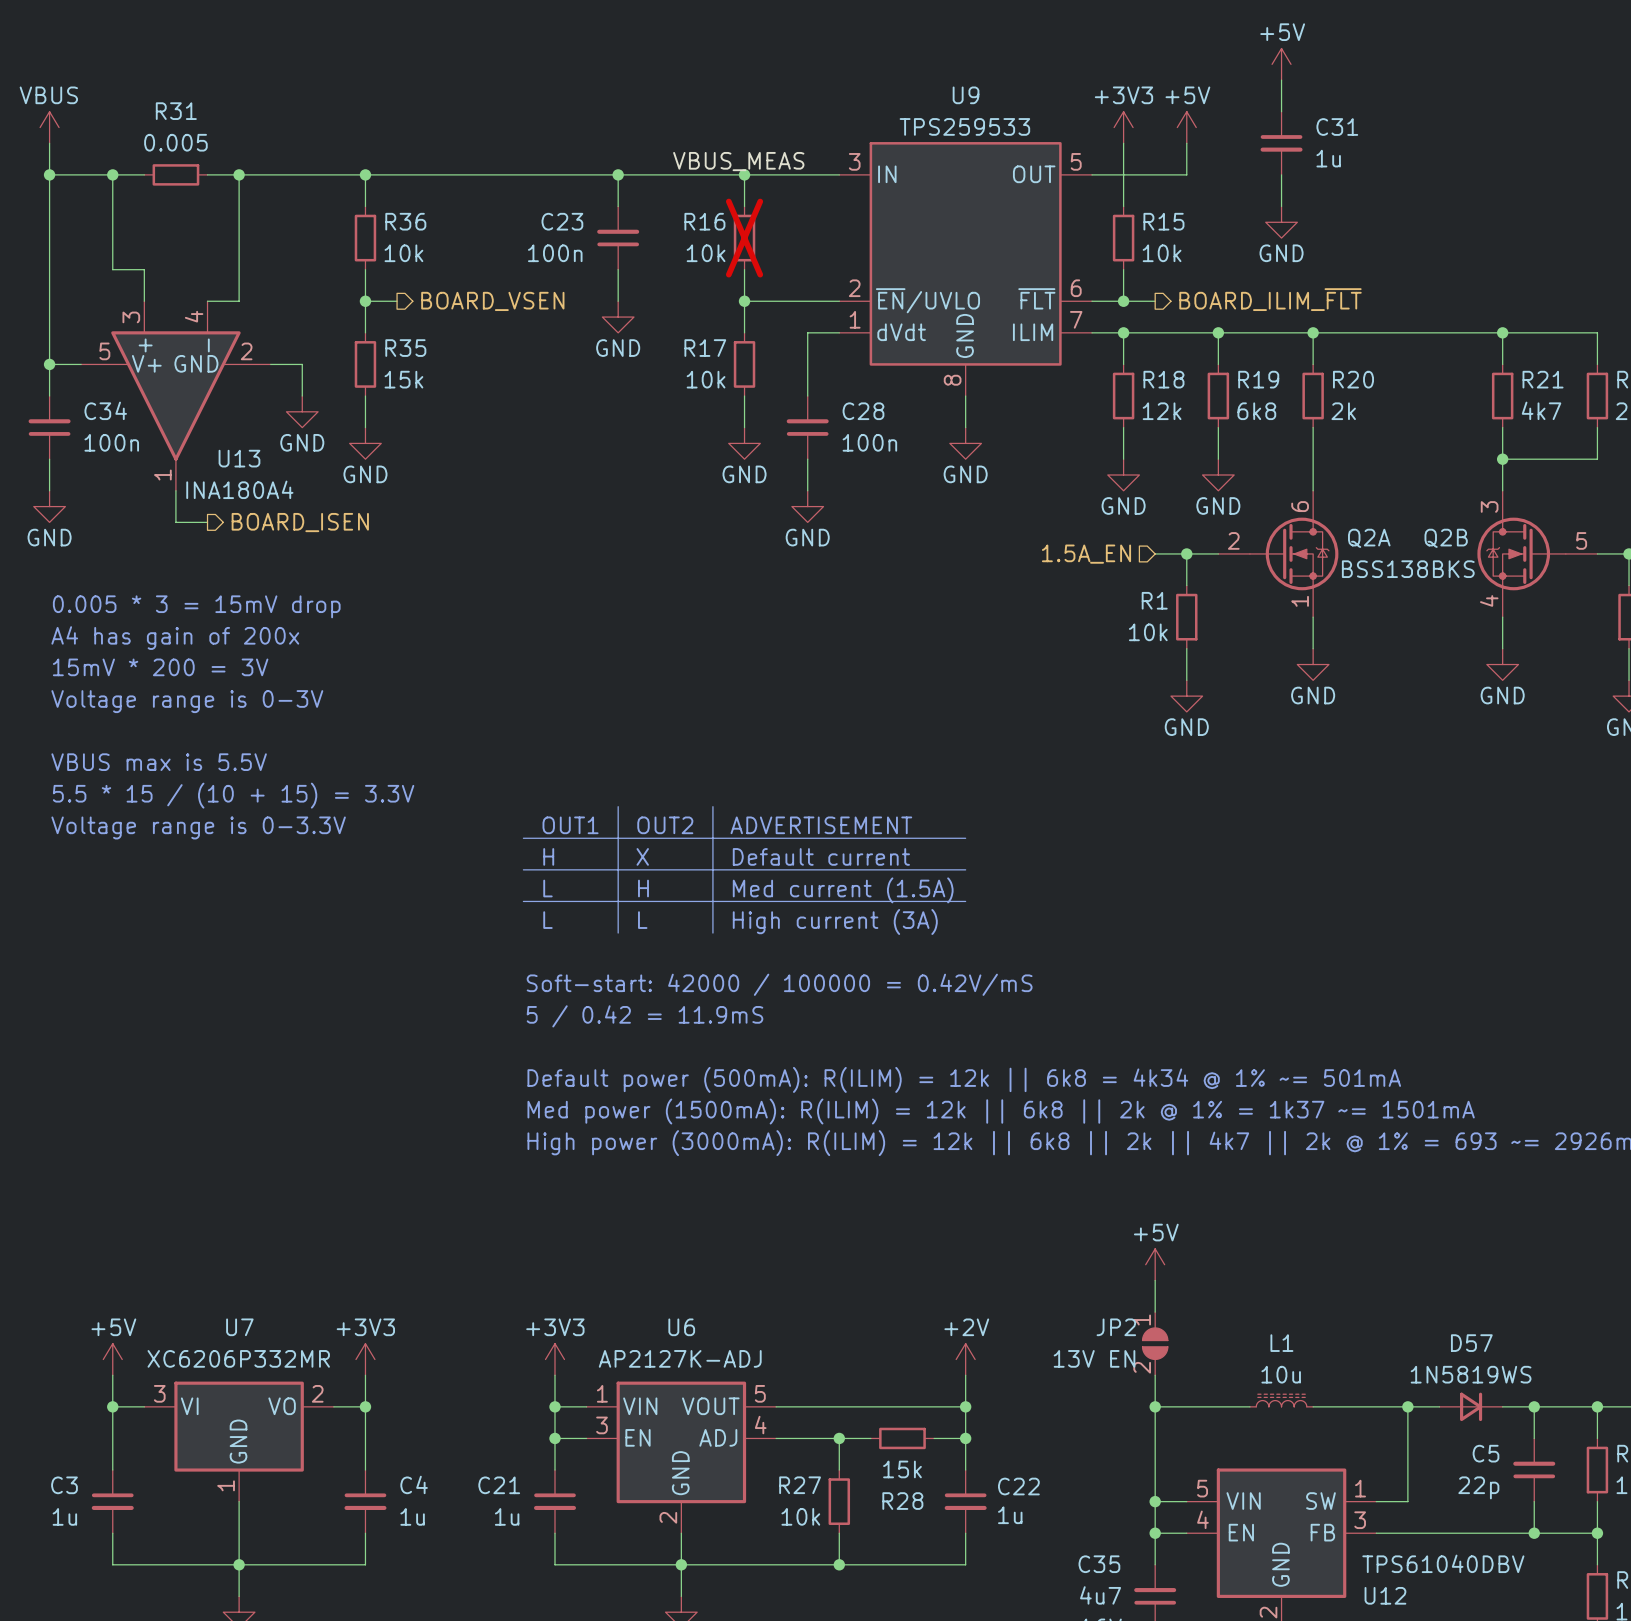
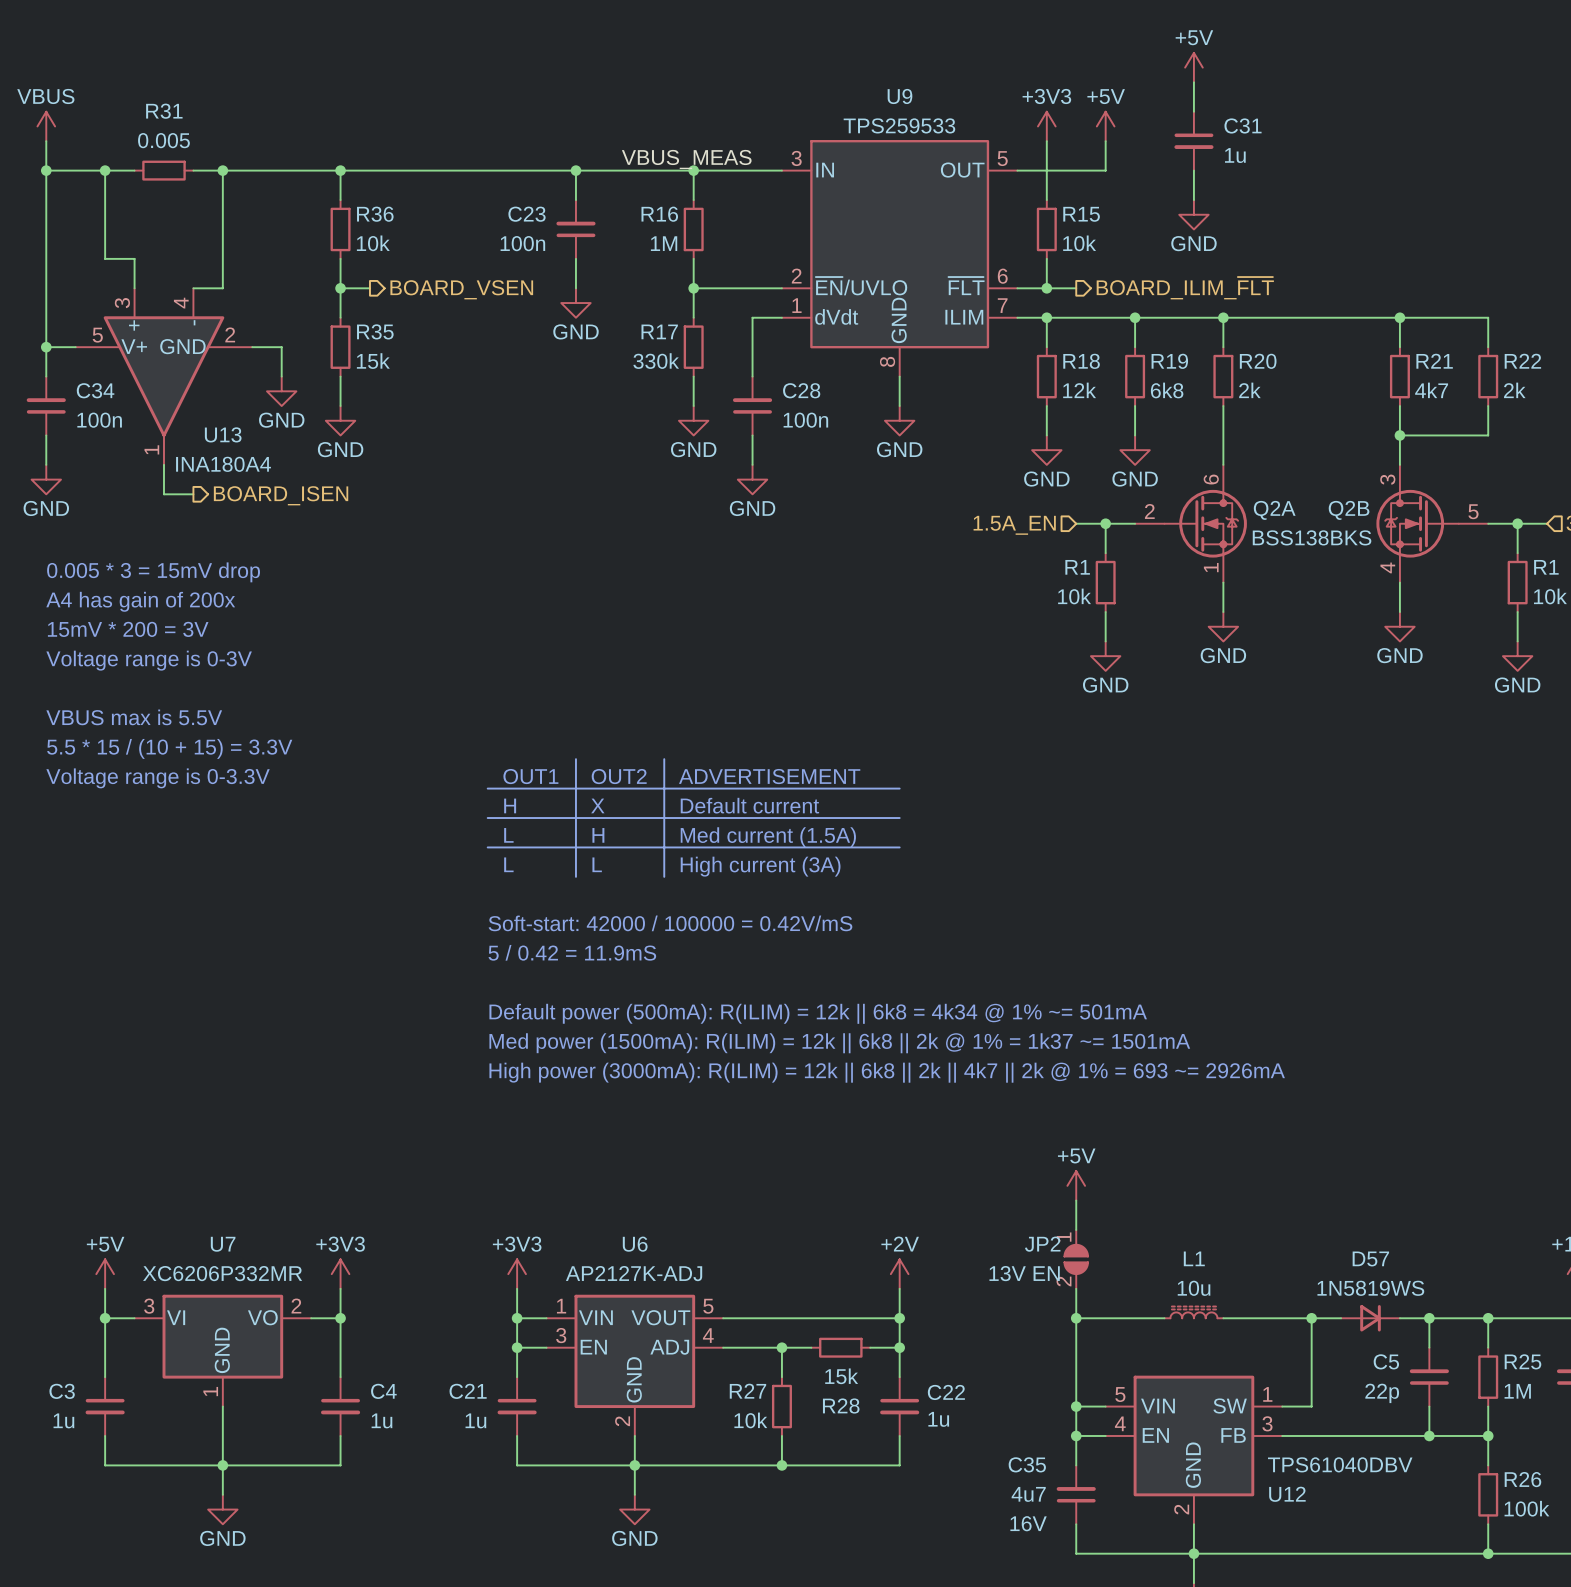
R16 do-not-place cross: (744, 238) -> none
R16 value: 10k (706, 253) -> 1M (664, 243)
R17 value: 10k (706, 379) -> 330k (656, 361)

